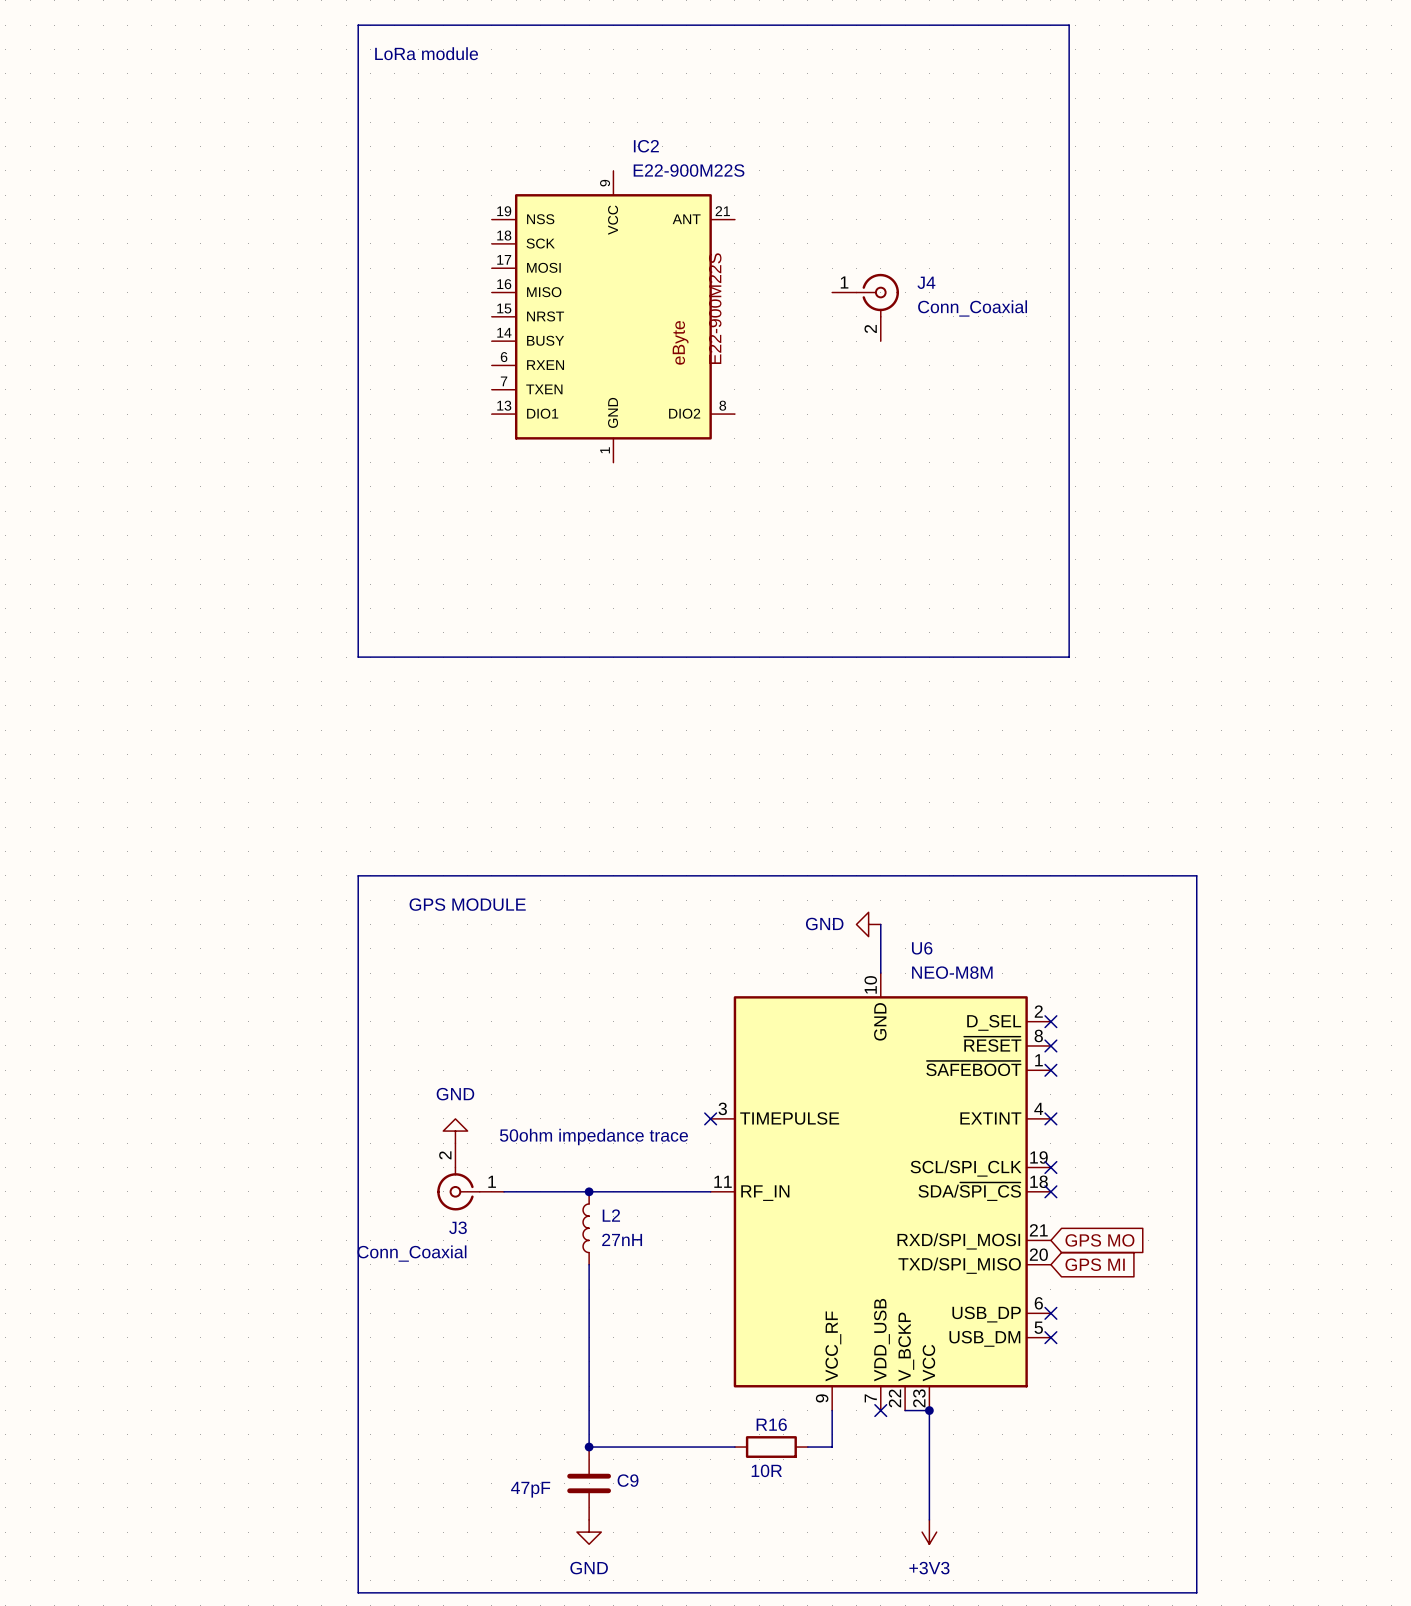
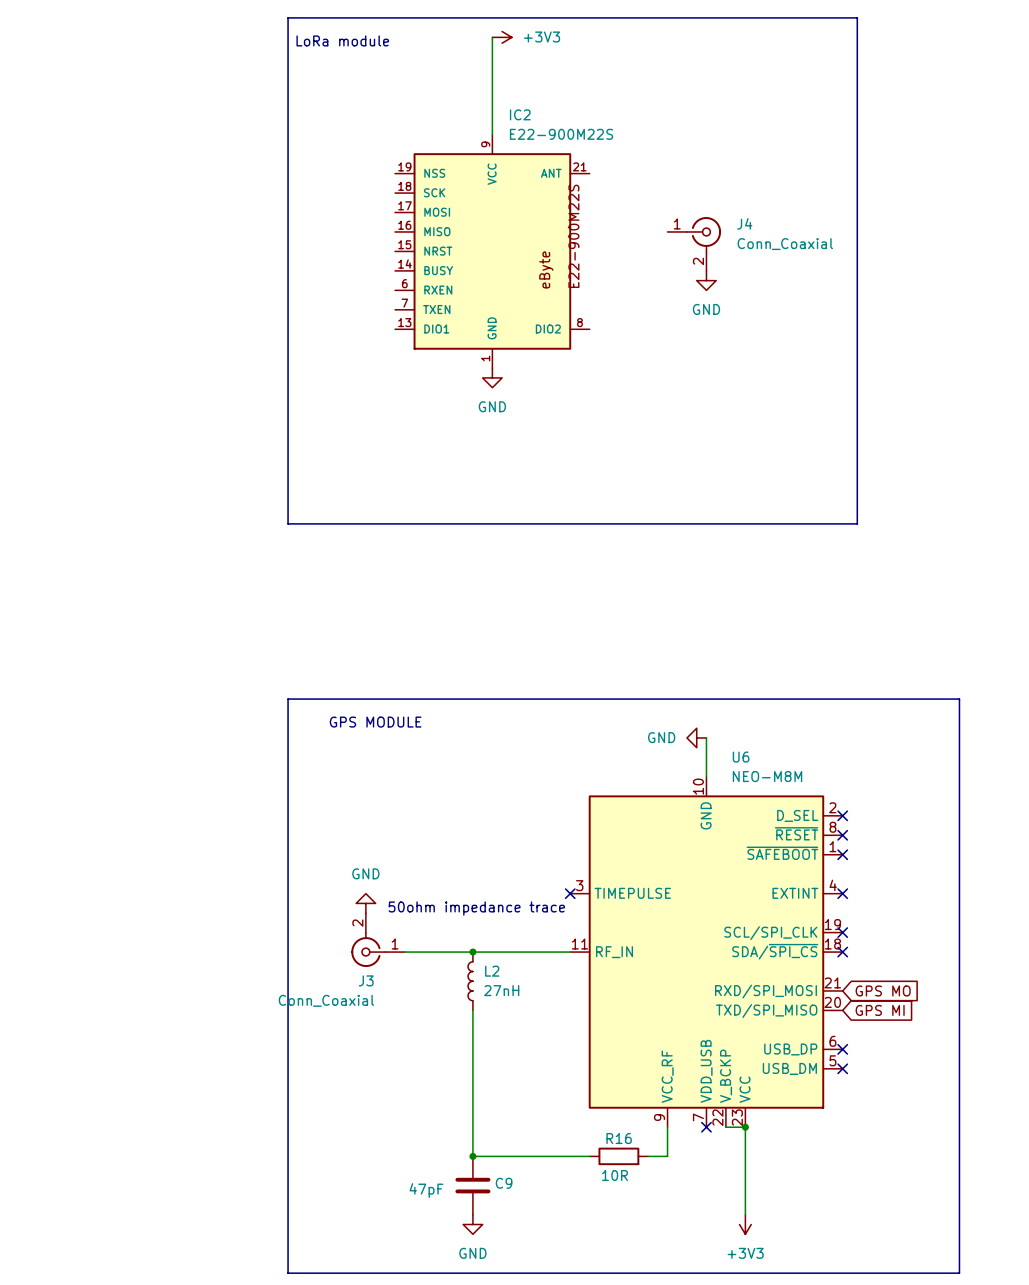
wire: none -> (492, 37) (492, 134)
power symbol: none -> +3V3 (502, 37)
power symbol: none -> GND (706, 280)
power symbol: none -> GND (492, 377)

